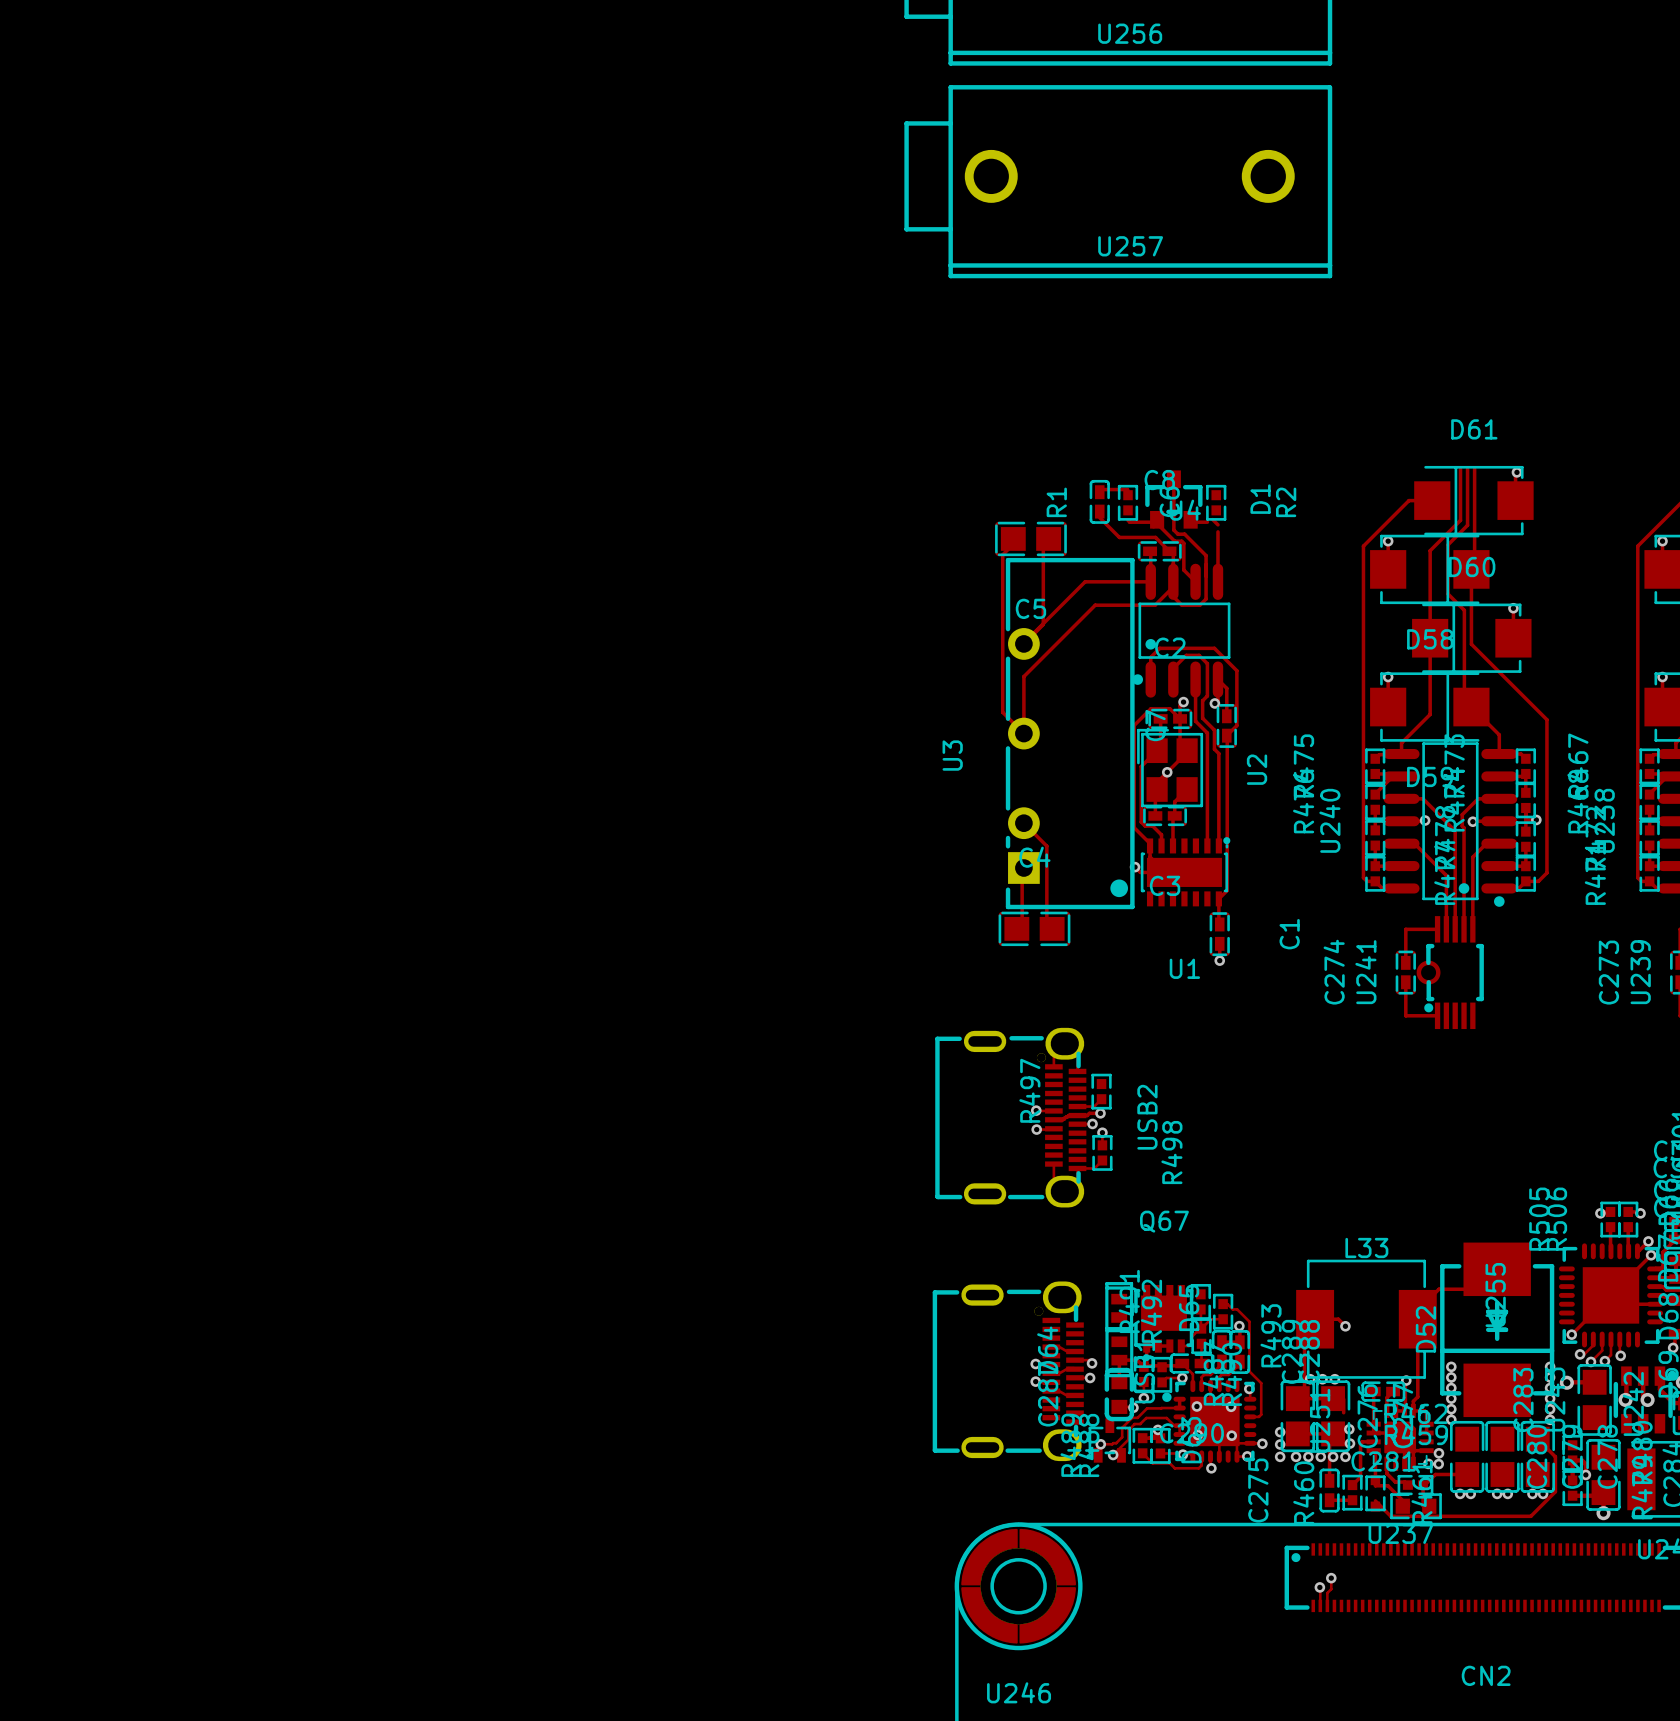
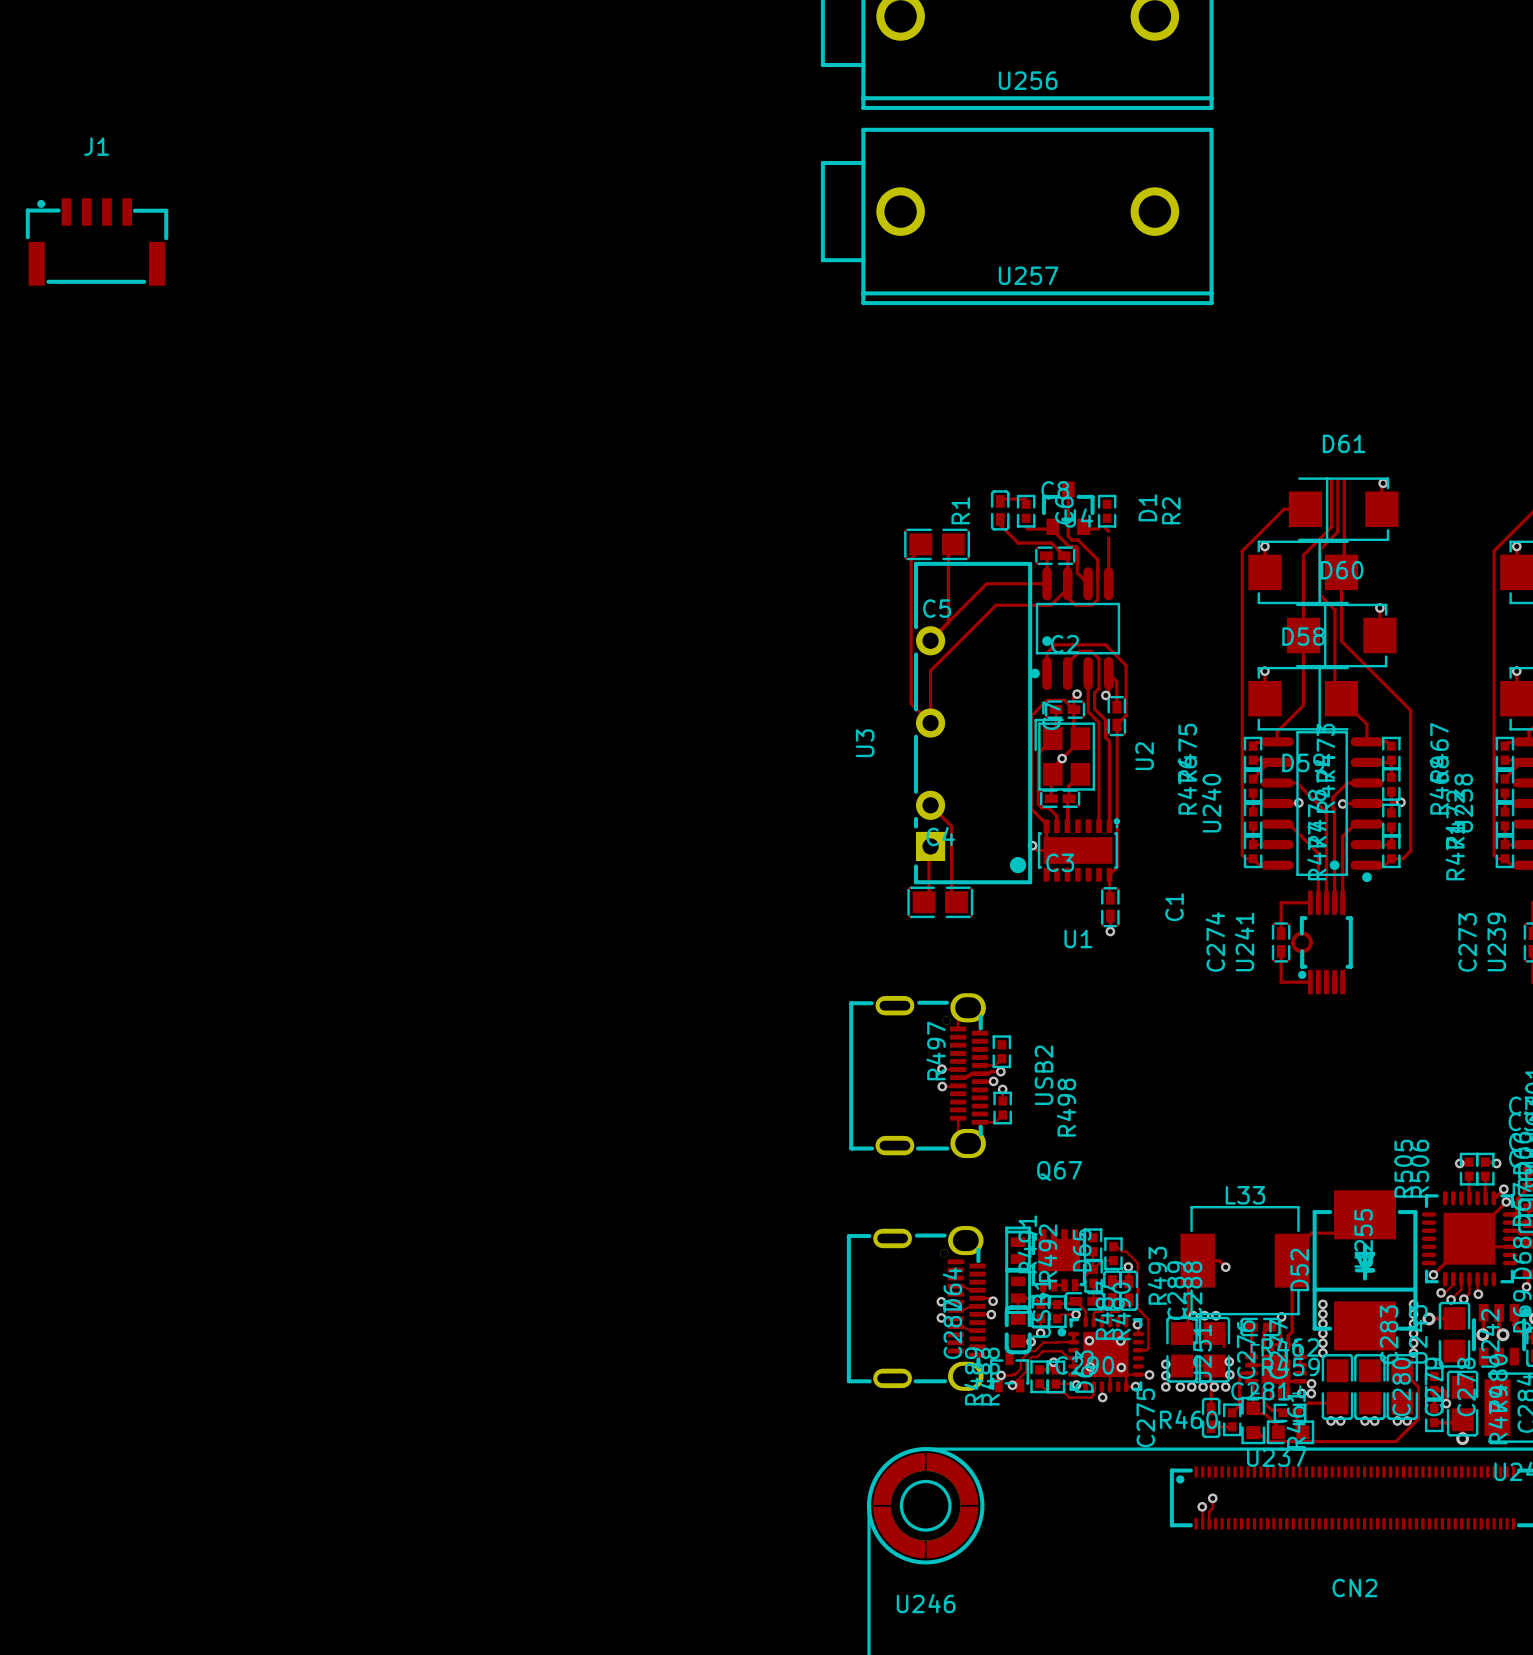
J1: none -> (97, 241)
R460 footprint: [1365, 1475, 1386, 1512] -> [1241, 1396, 1266, 1445]
R460 name rotation: 0° (1303, 1492) -> 90° clockwise (1188, 1419)

